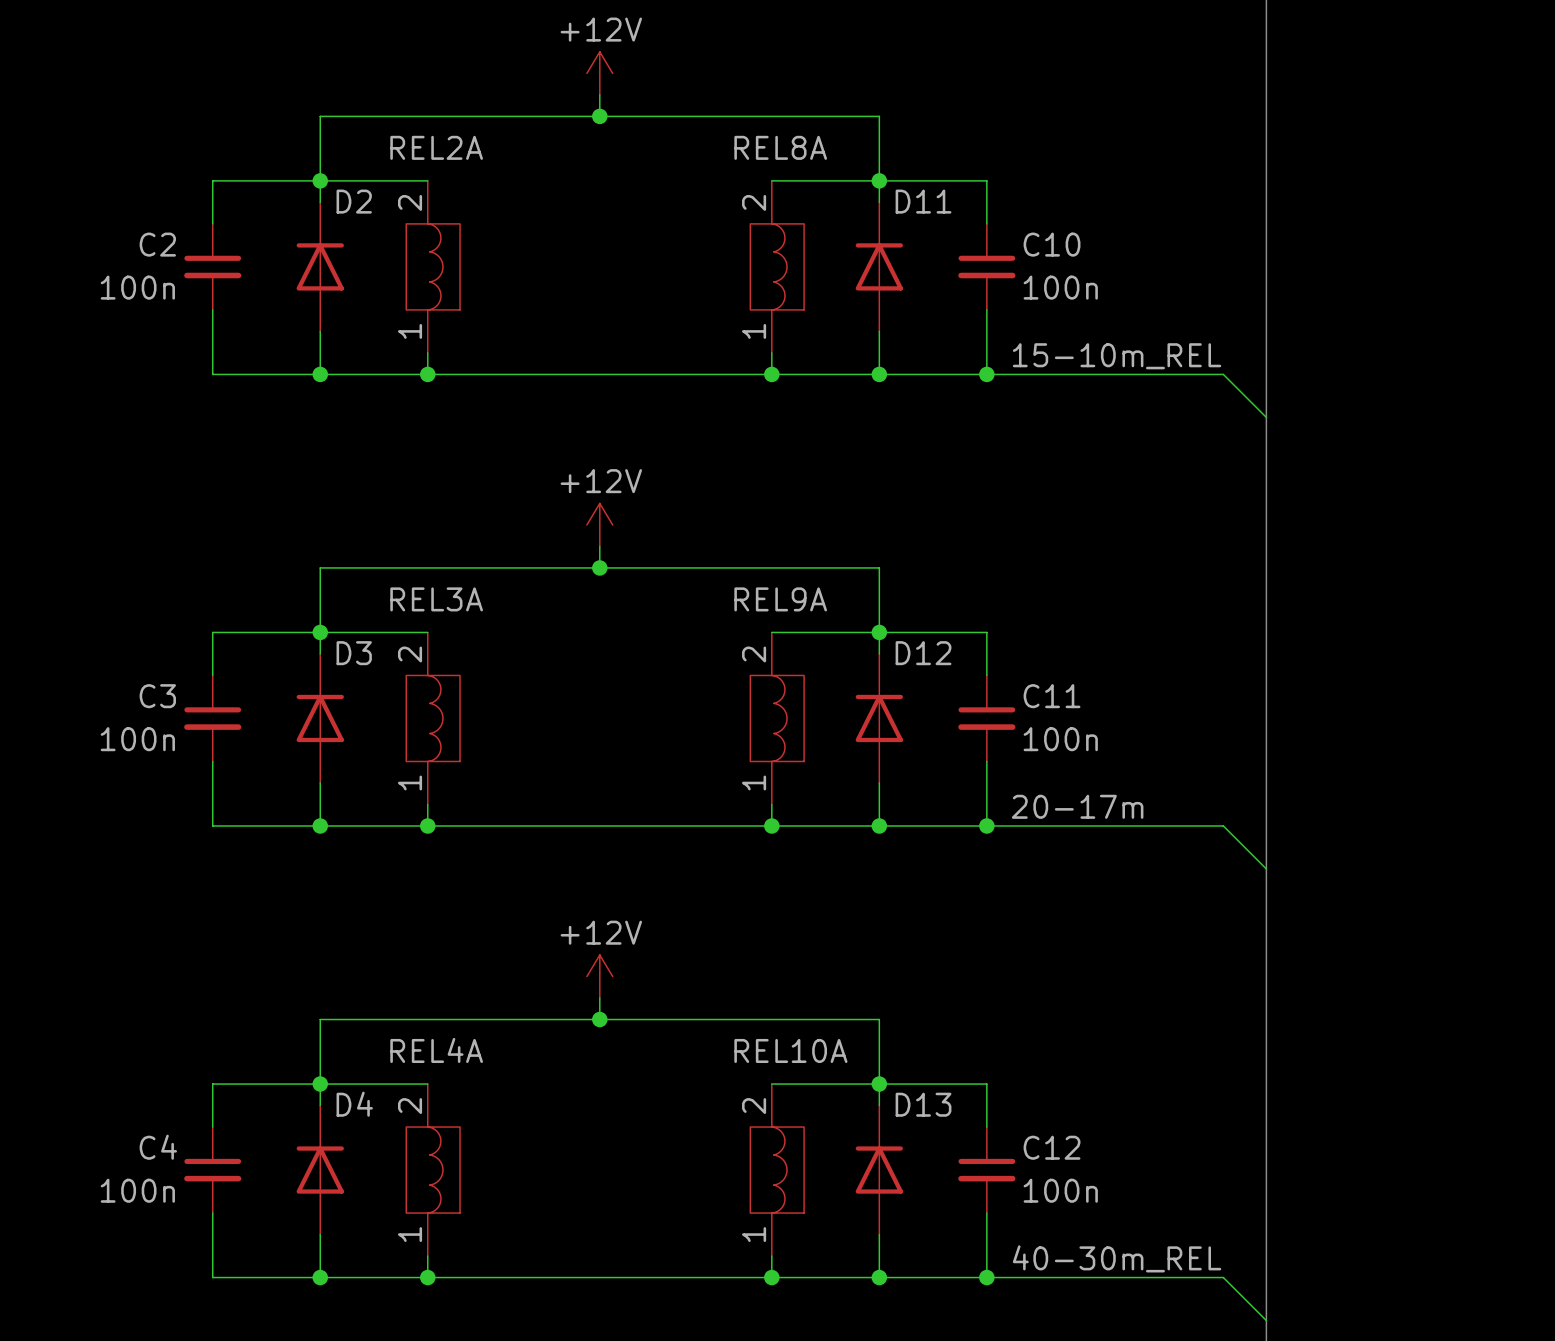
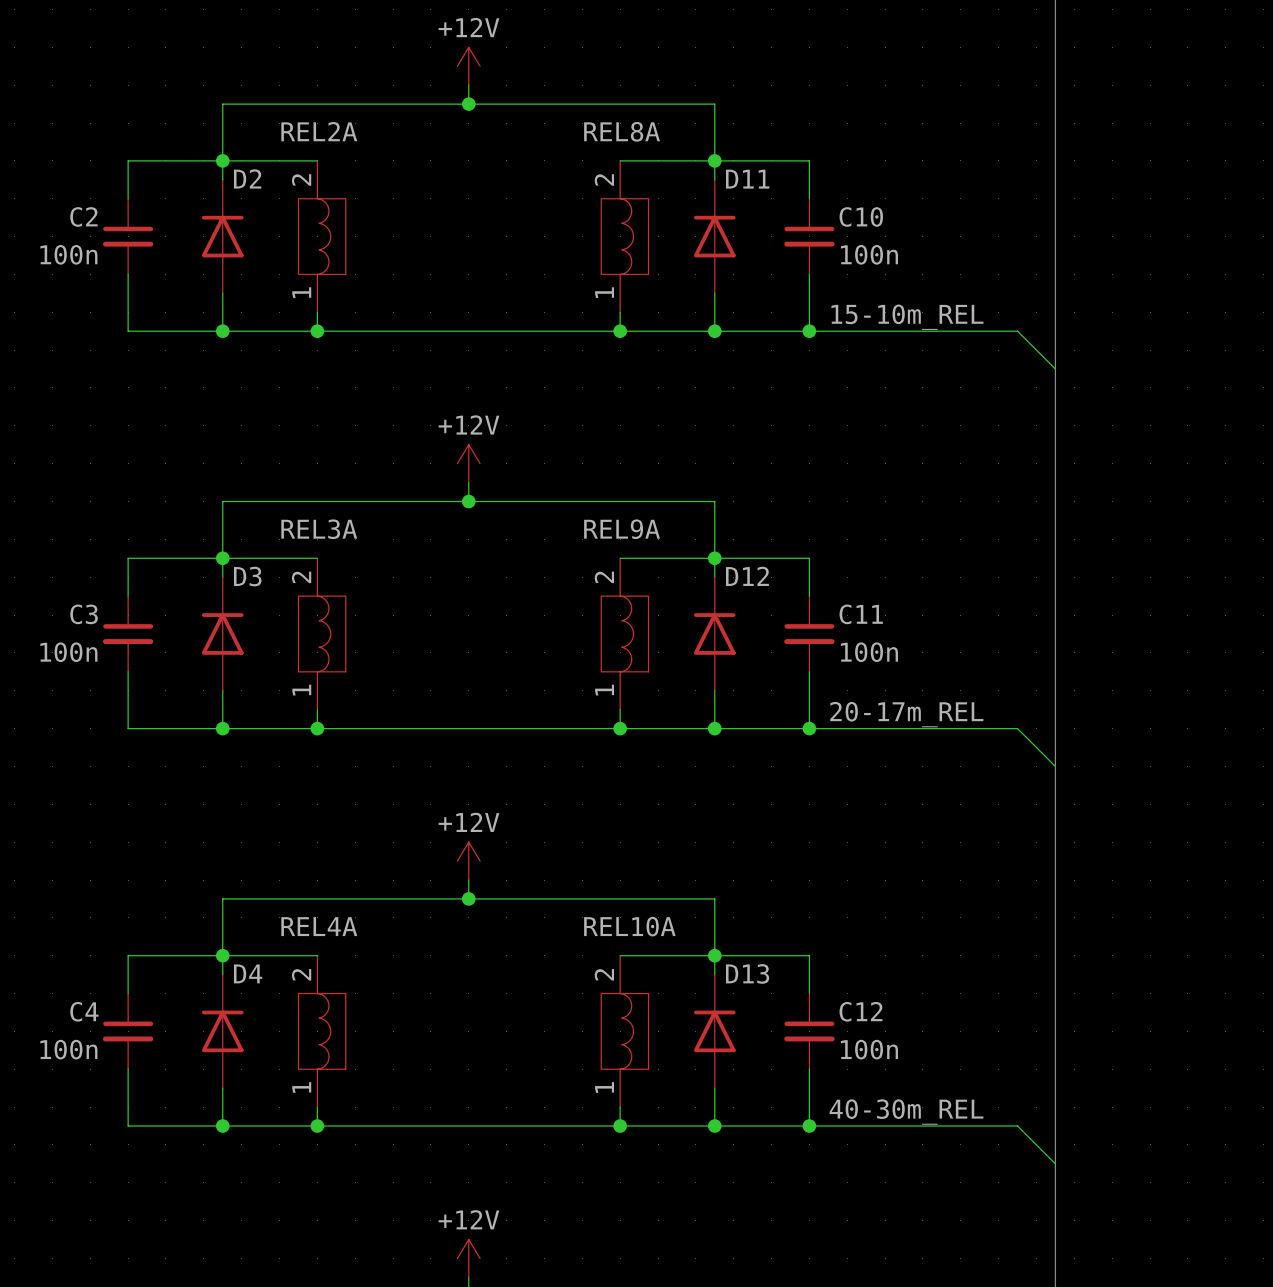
label: 20-17m (1077, 806) -> 20-17m_REL (906, 714)

